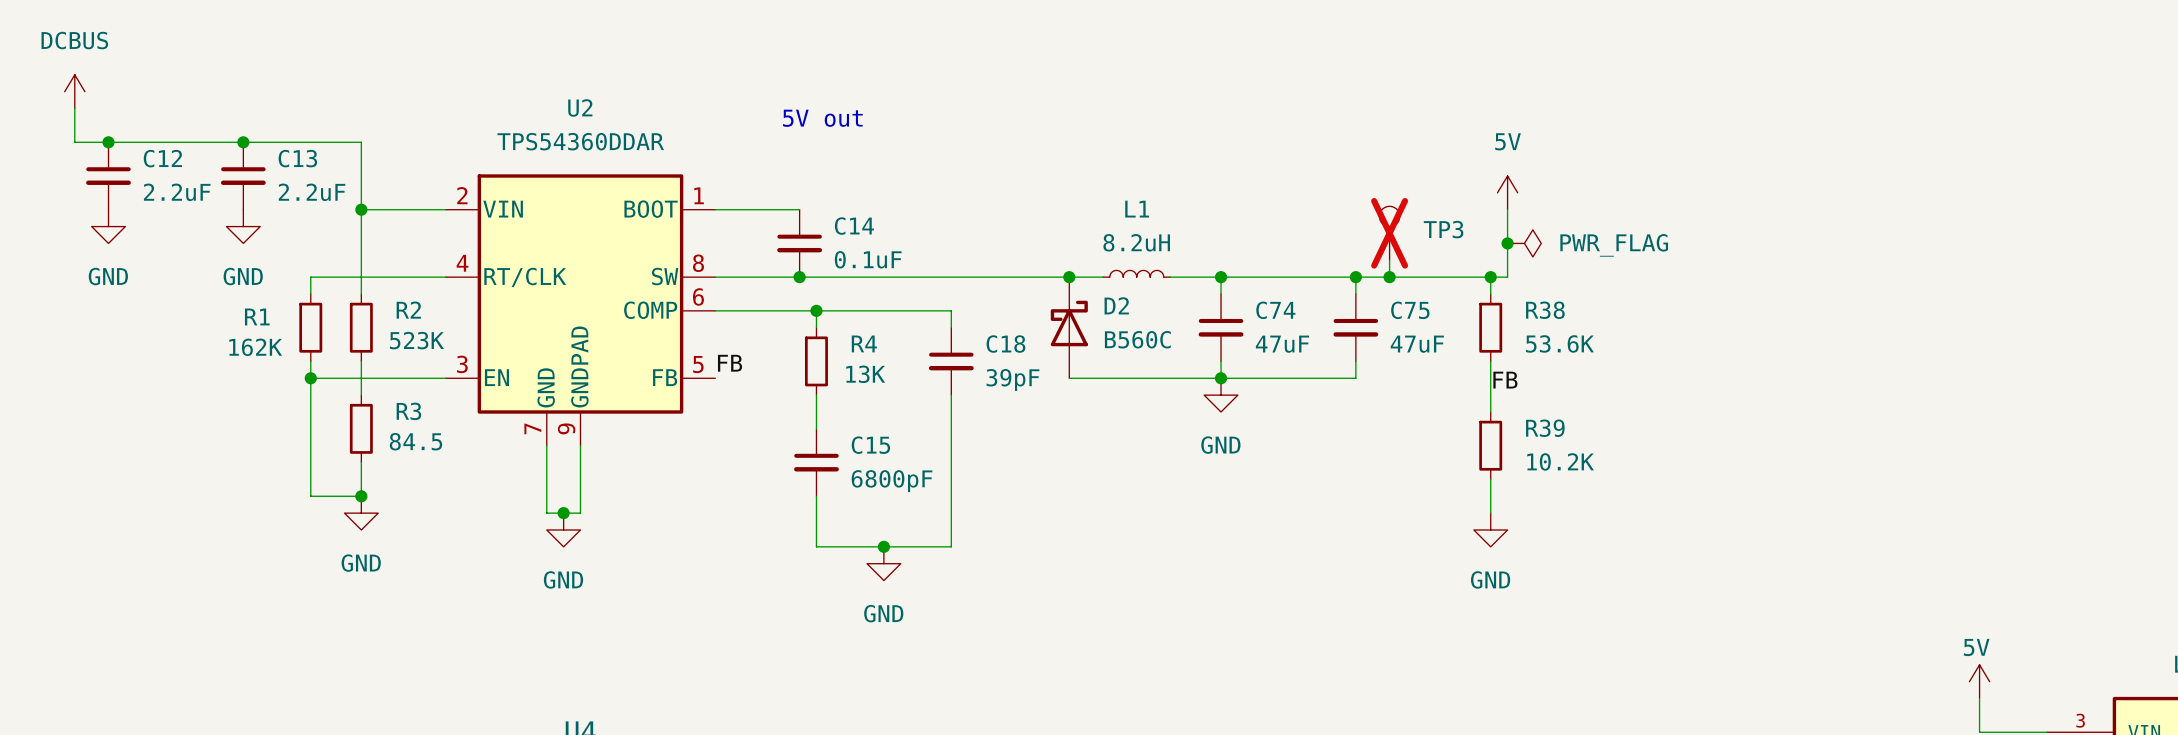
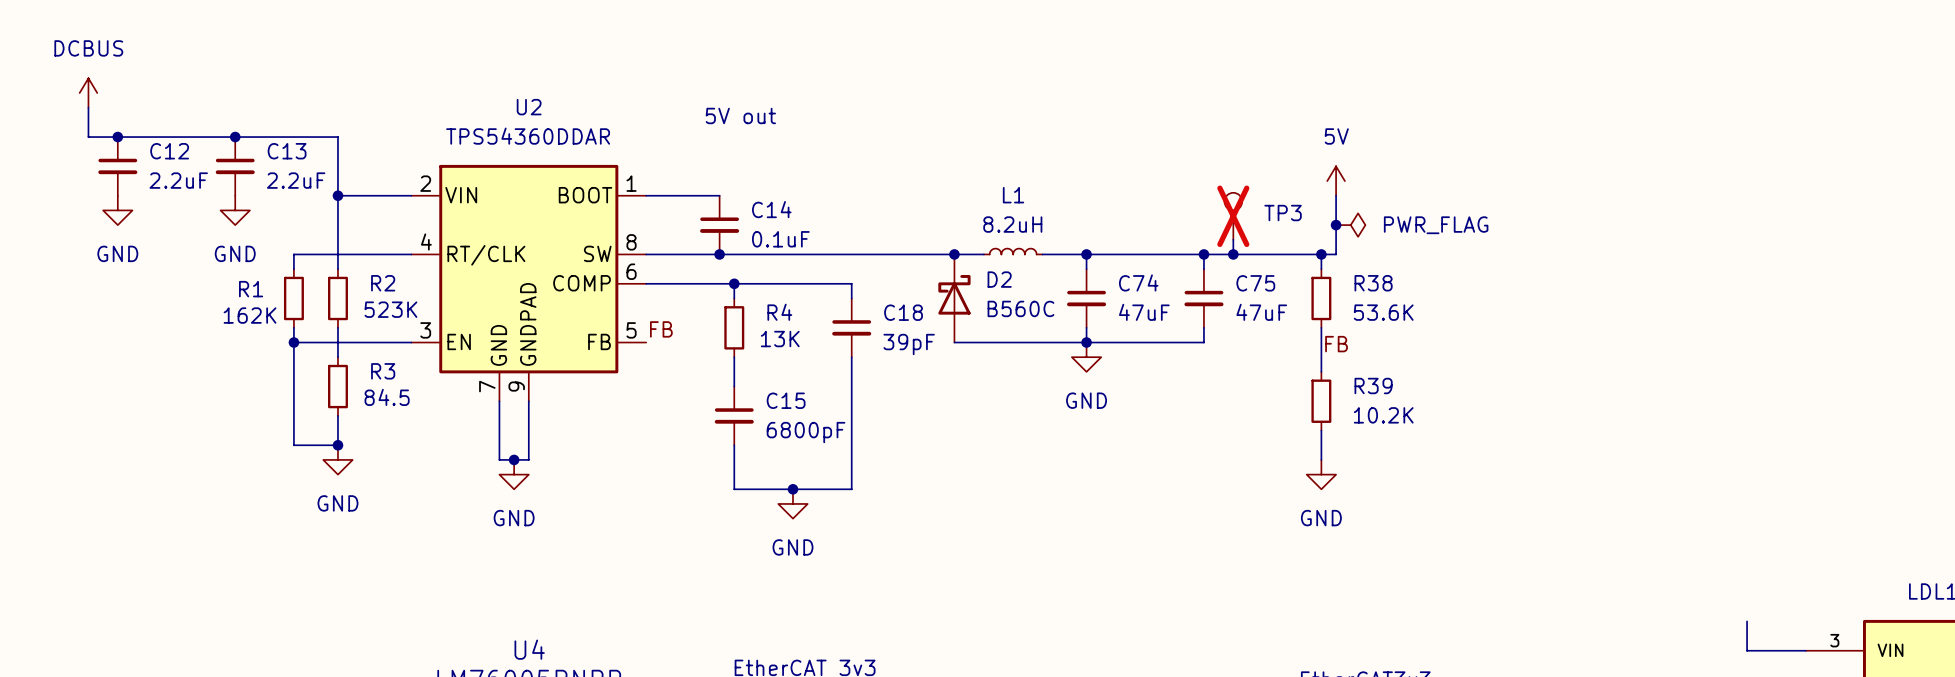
power symbol: 5V (1979, 681) -> none

